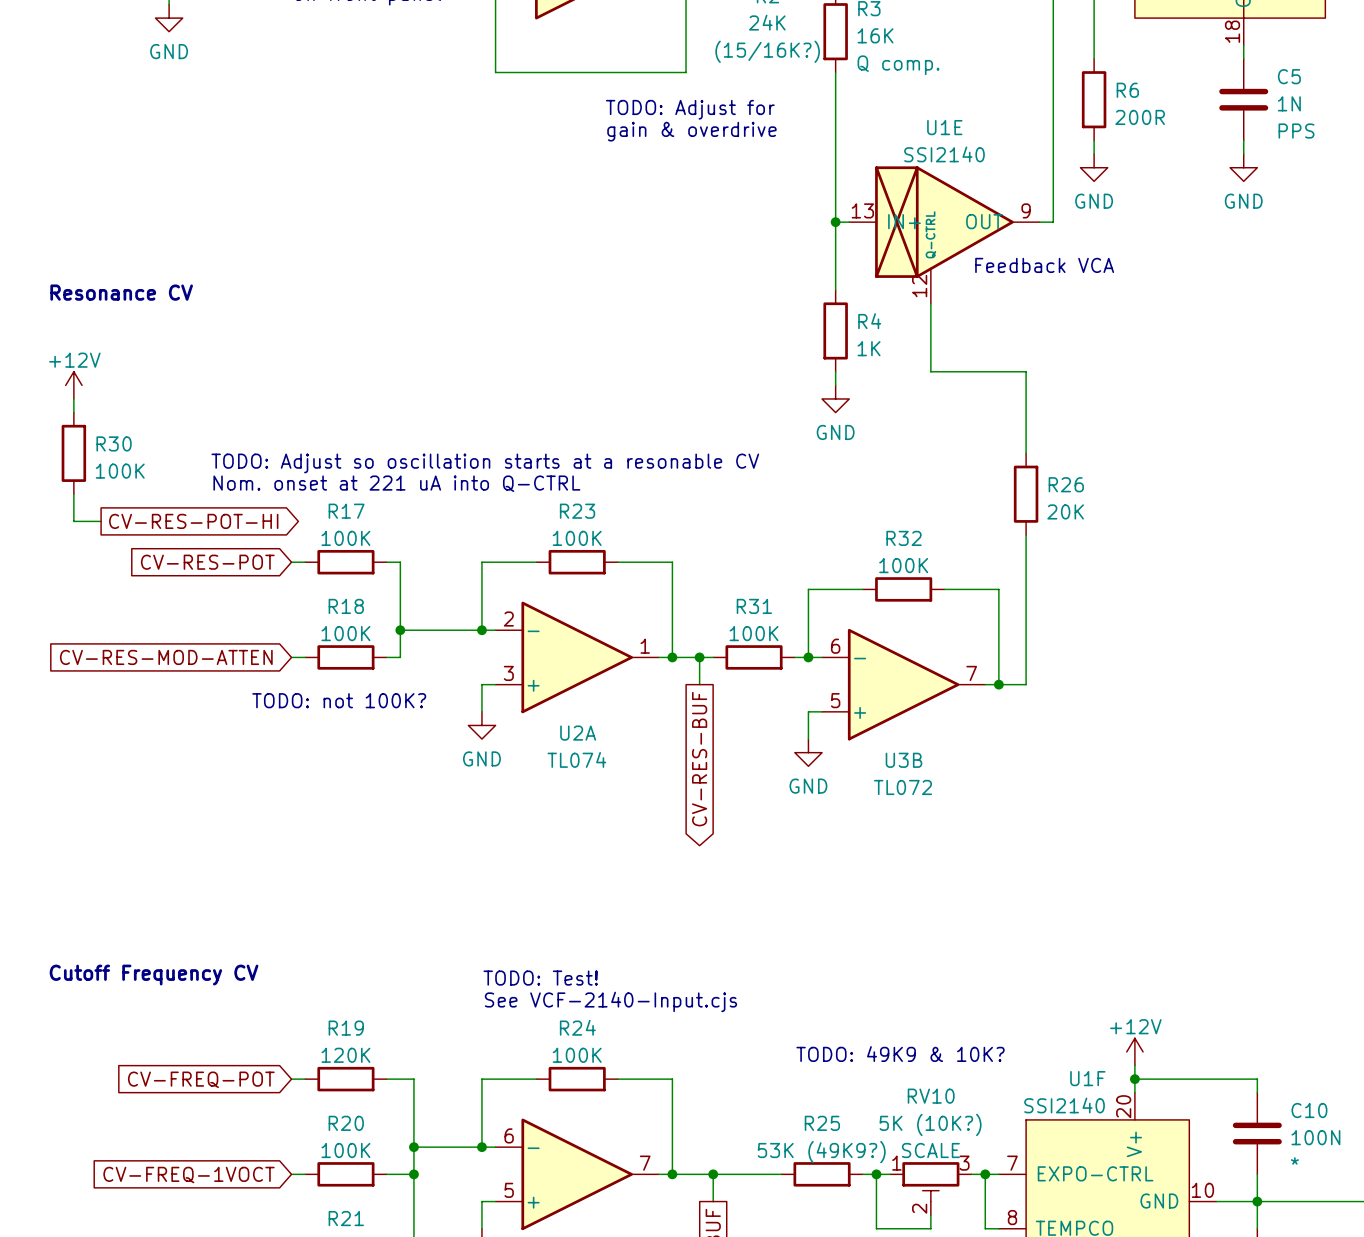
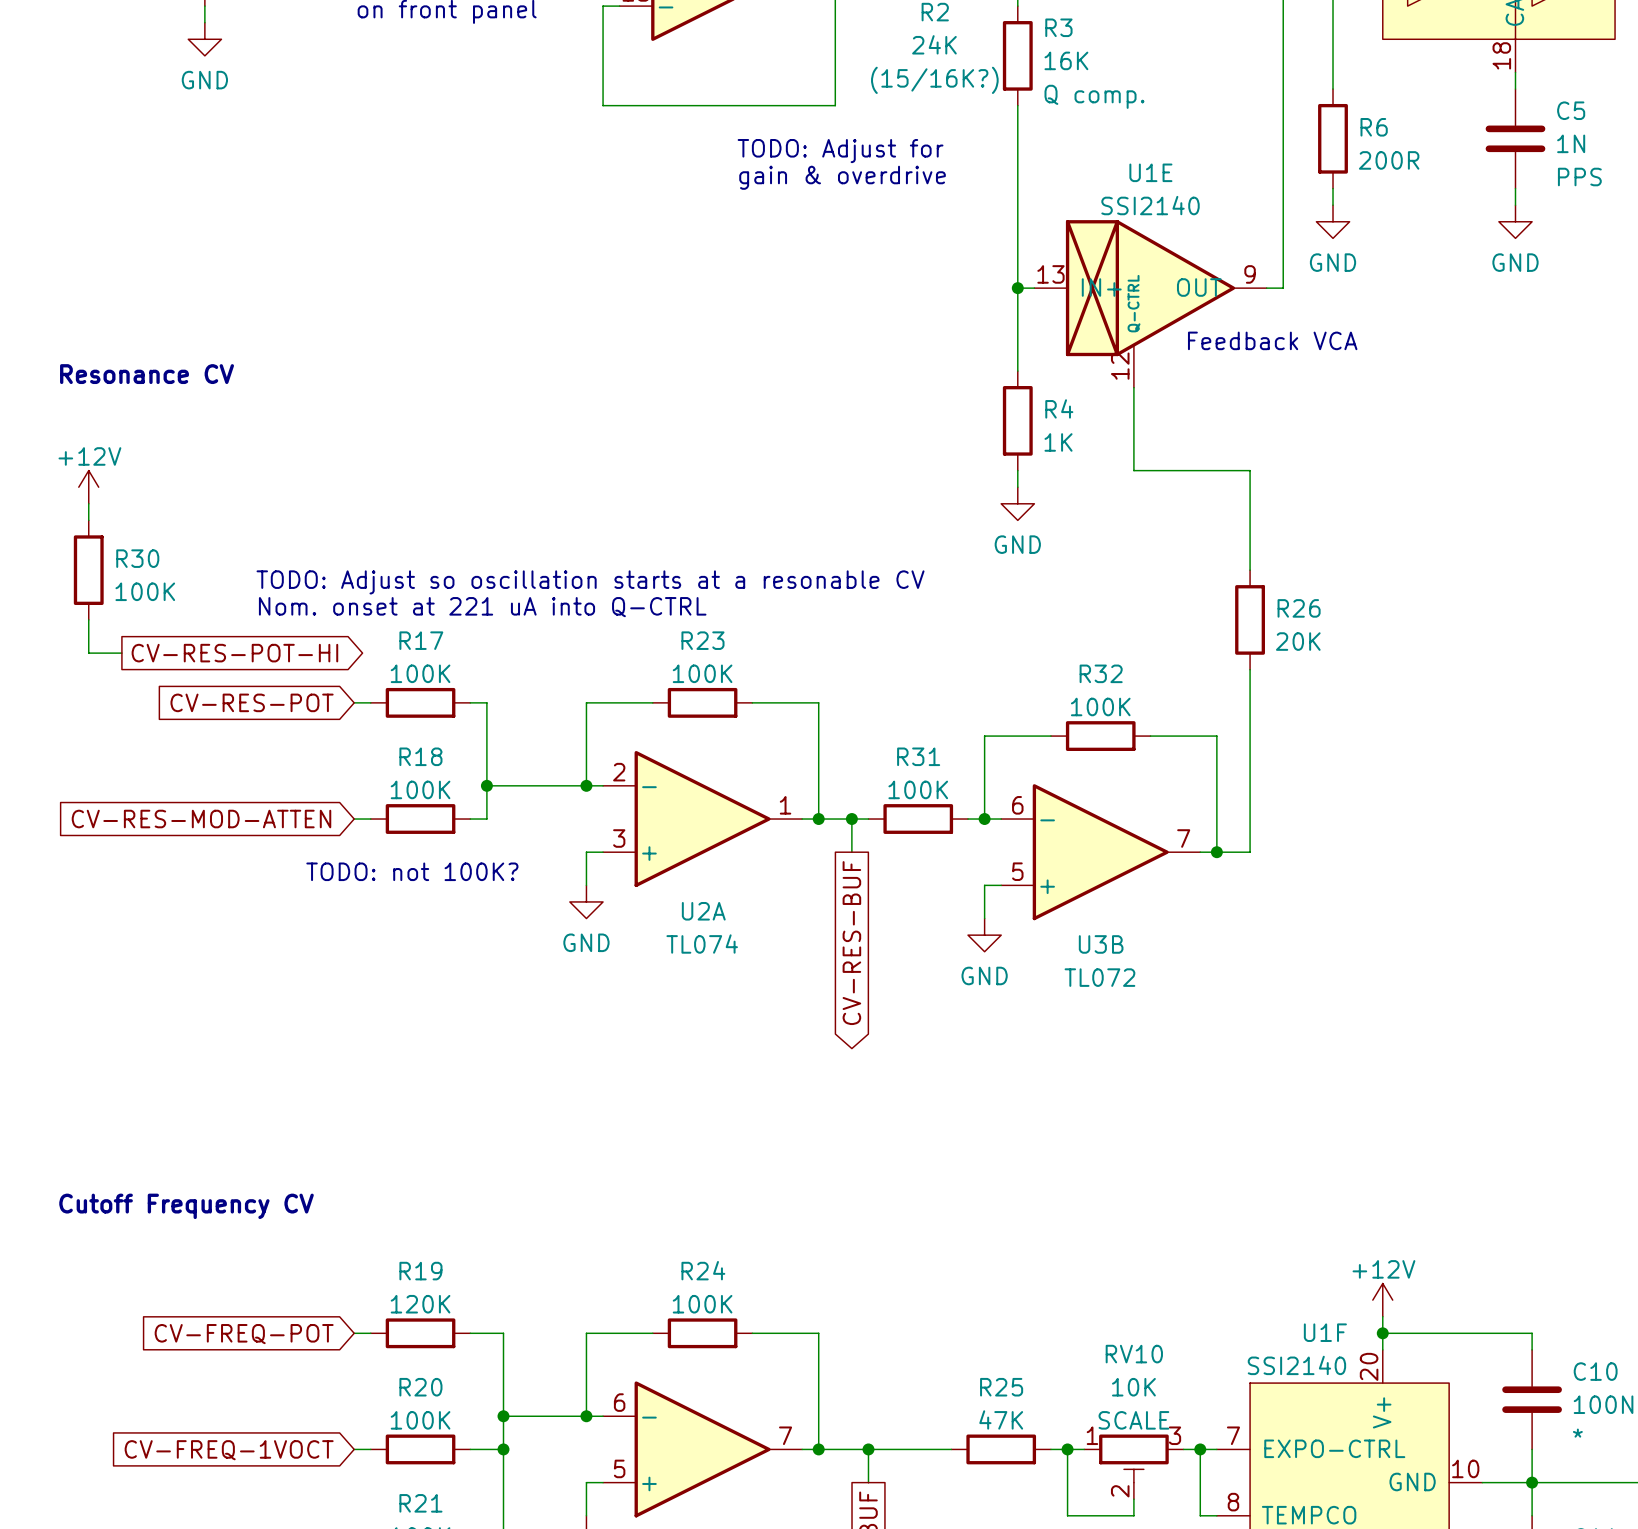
text: TODO: Test! (540, 978) -> none
text: See VCF-2140-Input.cjs (610, 1001) -> none
text: TODO: 49K9 & 10K? (900, 1054) -> none
RV10 value: 5K (10K?) (930, 1124) -> 10K (1133, 1387)
R25 value: 53K (49K9?) (821, 1152) -> 47K (1001, 1419)

